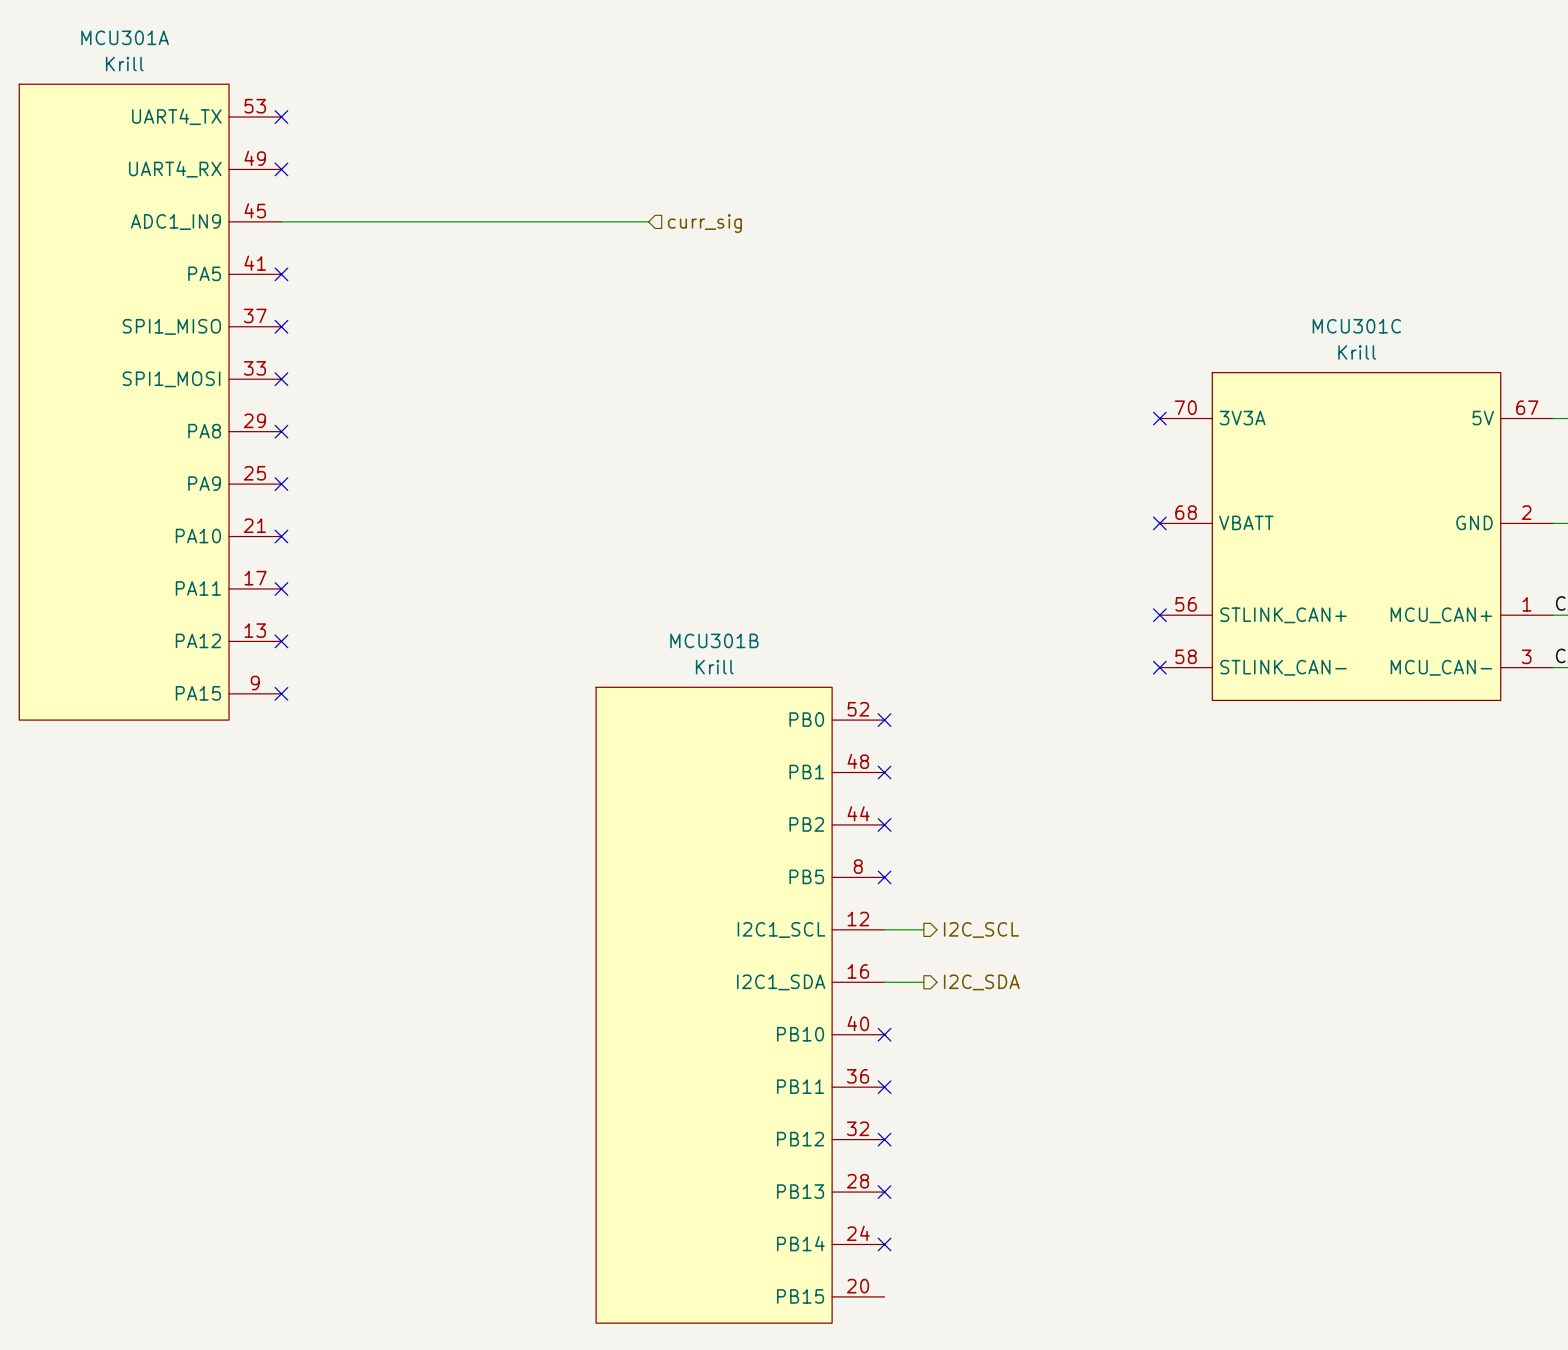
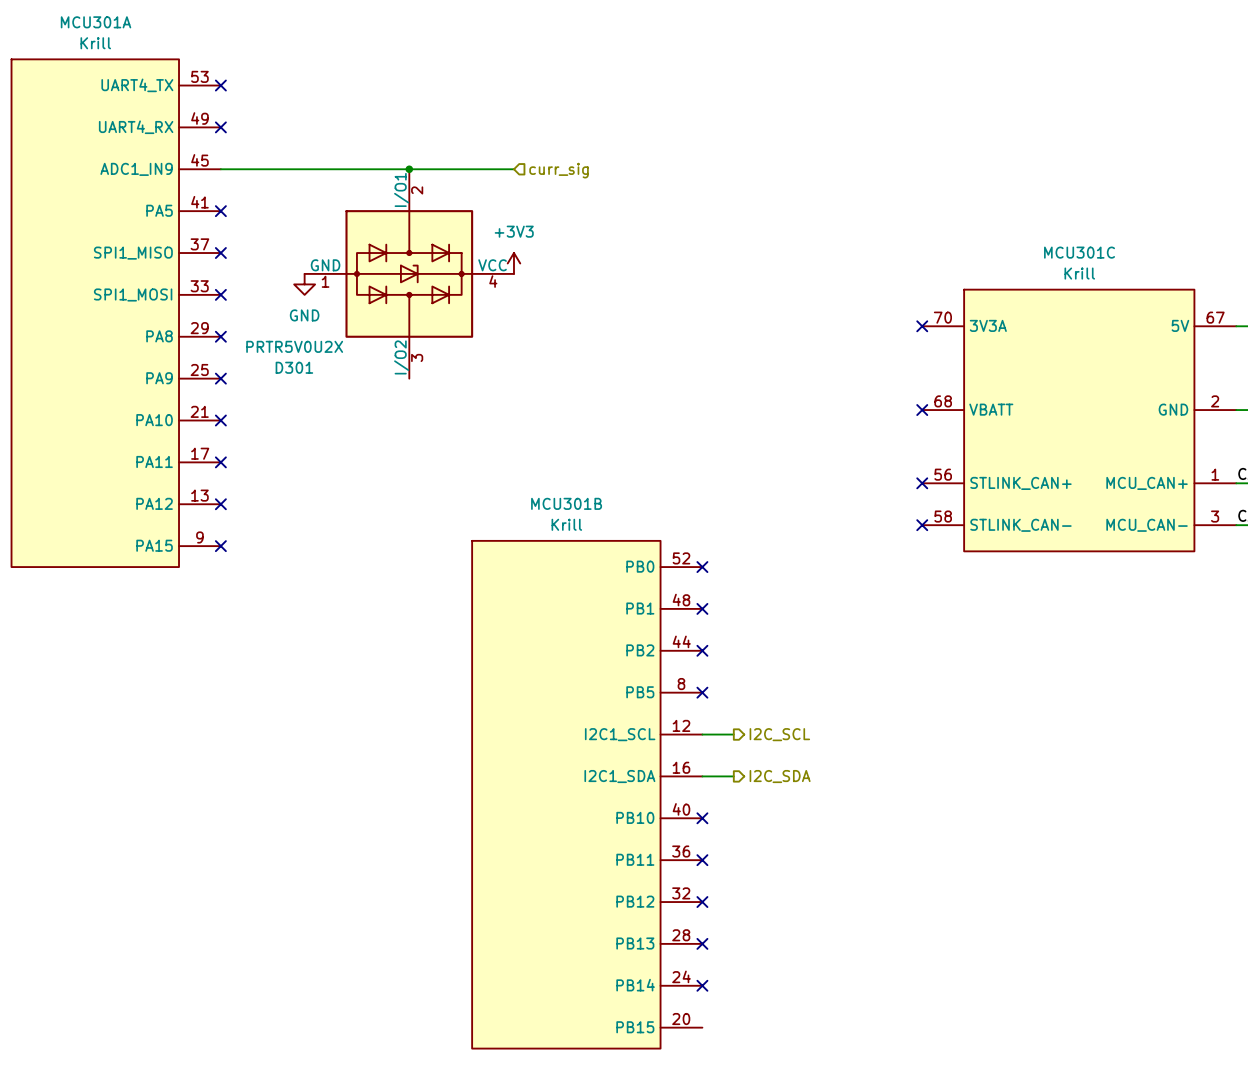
junction: none -> (409, 169)
power symbol: none -> +3V3 (513, 263)
D301: none -> PRTR5V0U2X (409, 273)
power symbol: none -> GND (304, 284)

